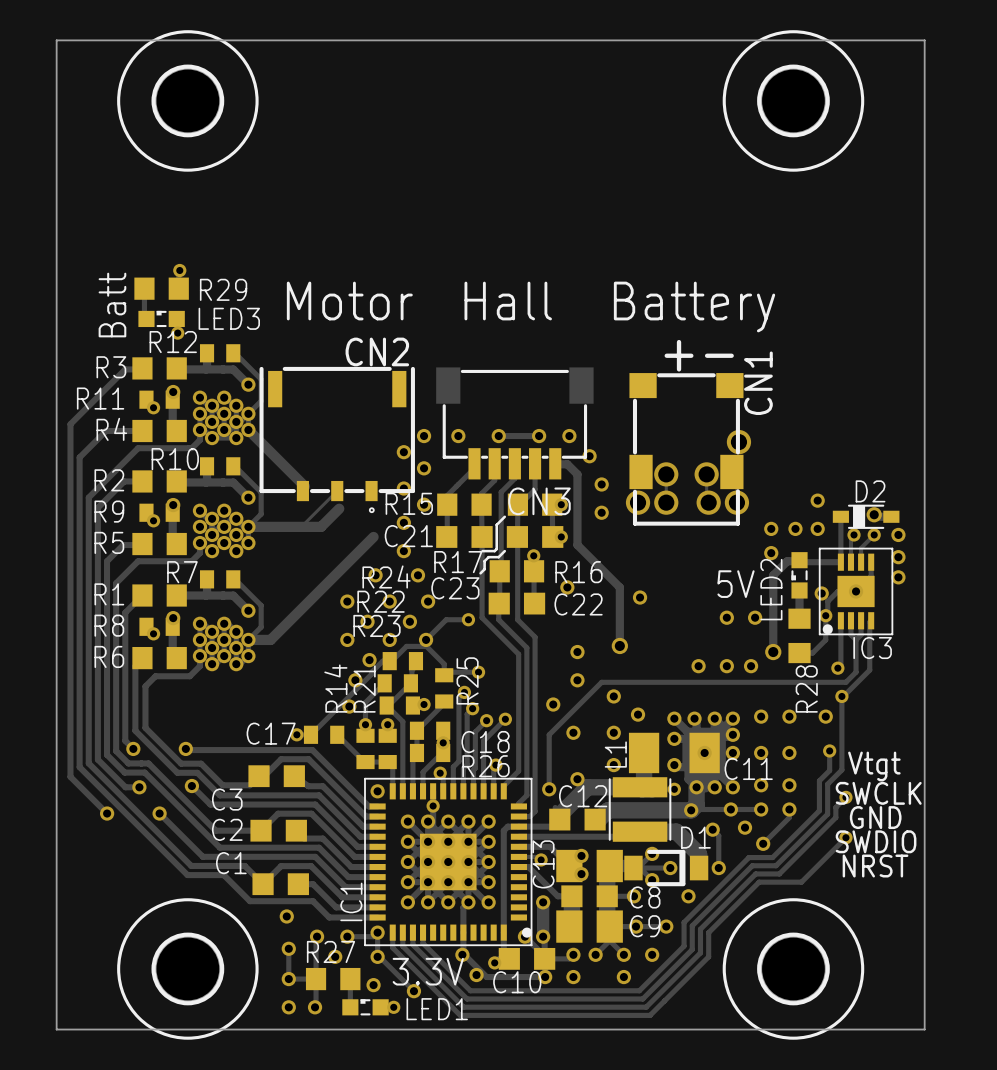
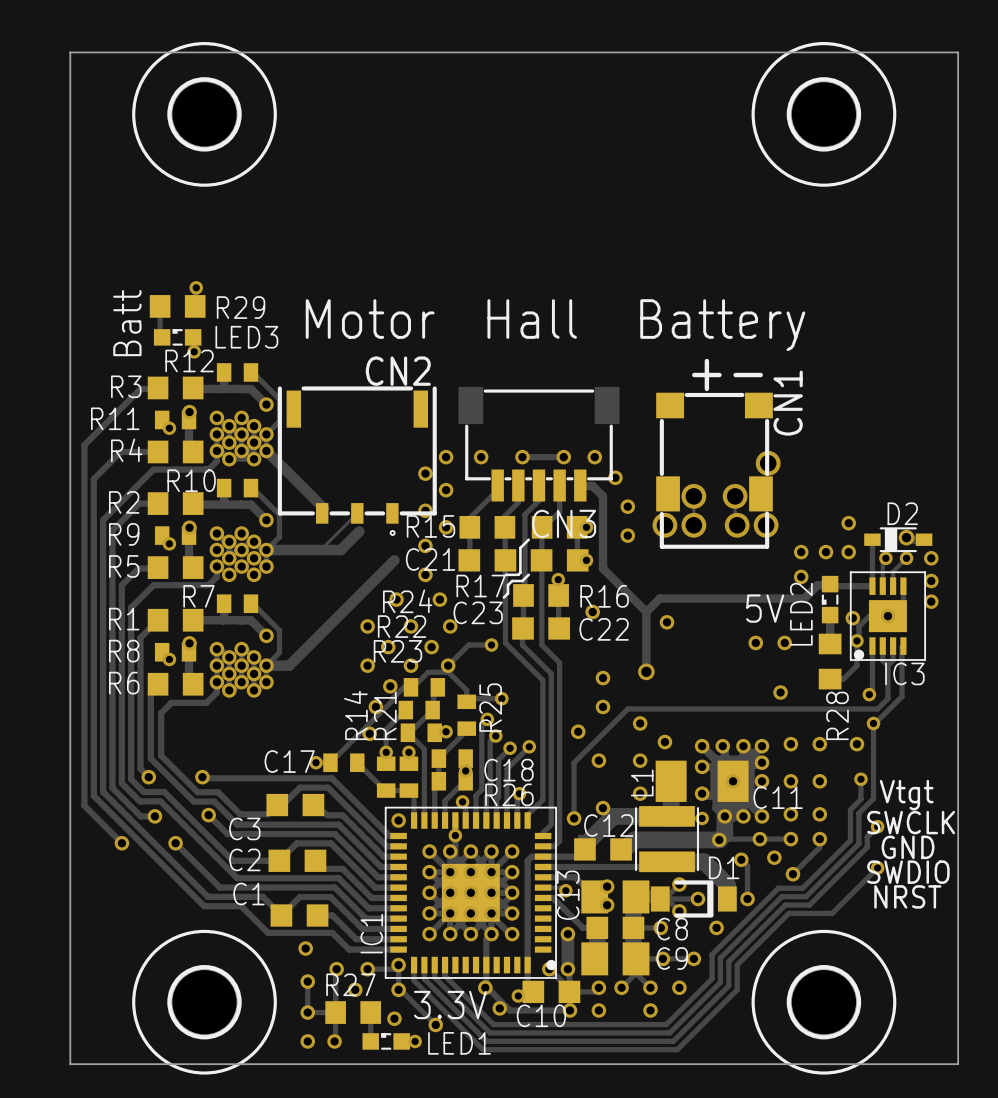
track: (774, 574) (773, 652) -> (804, 598) (659, 598) (646, 611)
via: (773, 652) -> none
via: (698, 666) -> none
via: (726, 666) -> none

